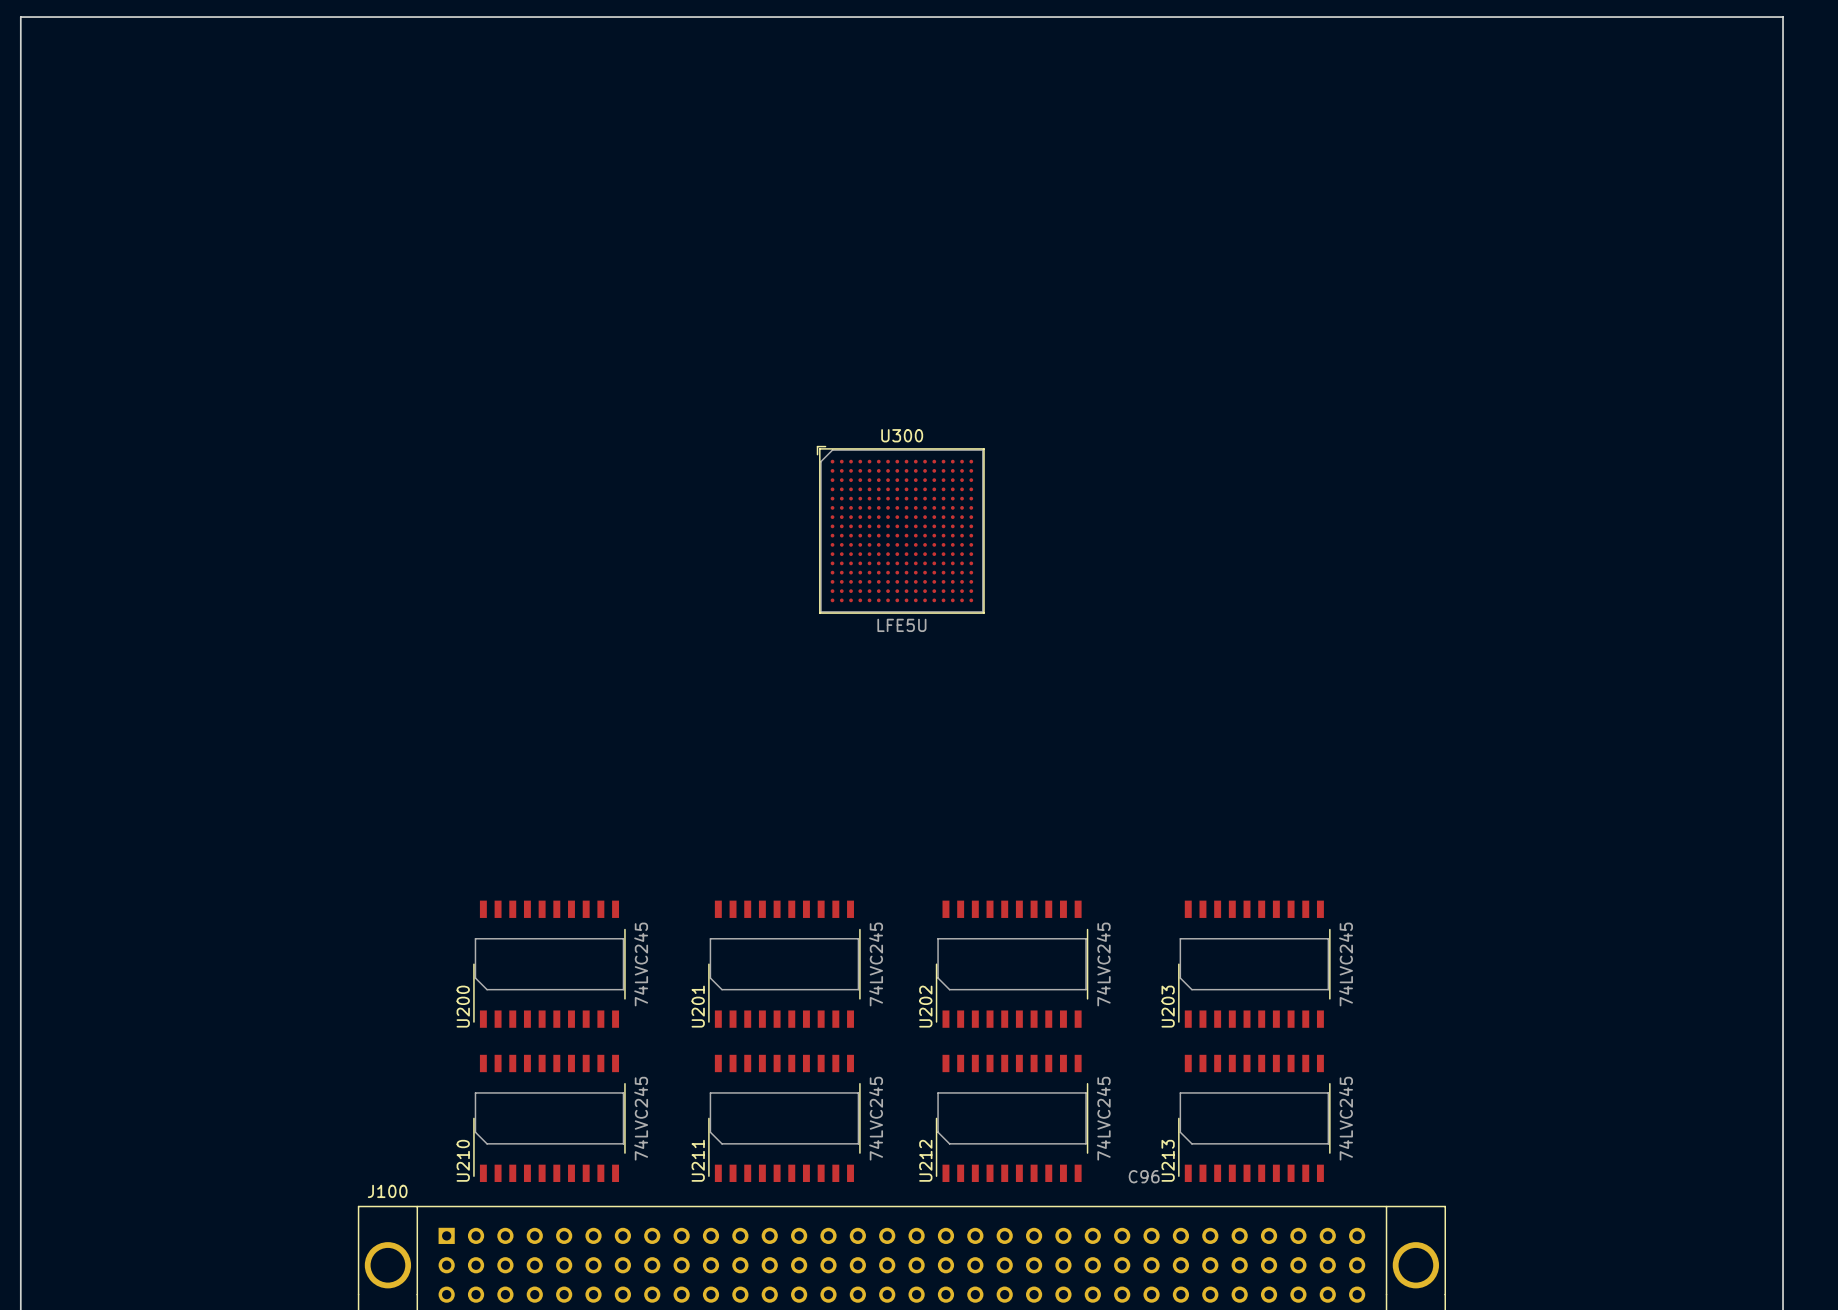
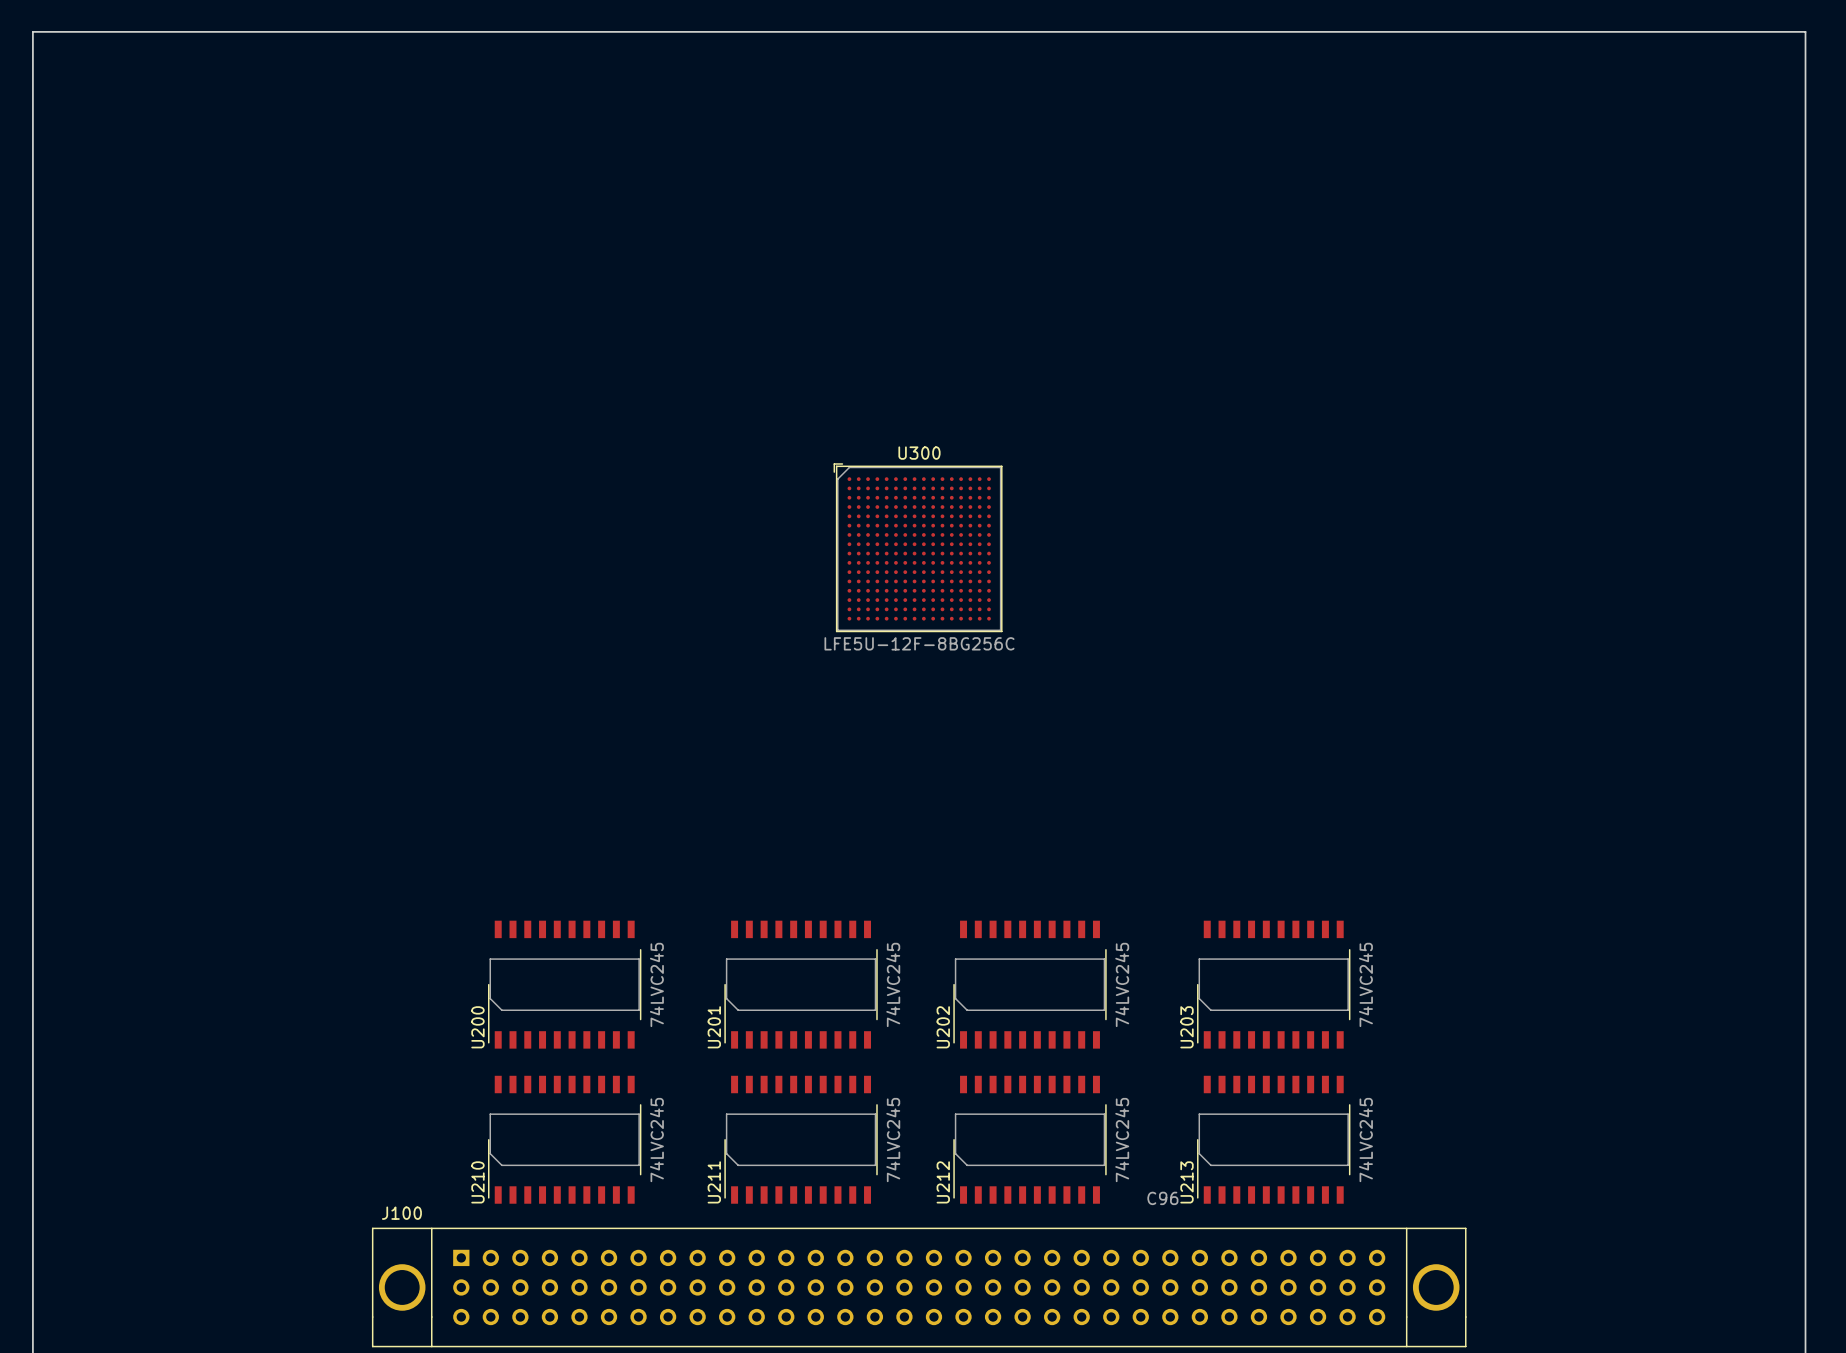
U300 value: LFE5U (901, 625) -> LFE5U-12F-8BG256C (919, 643)

